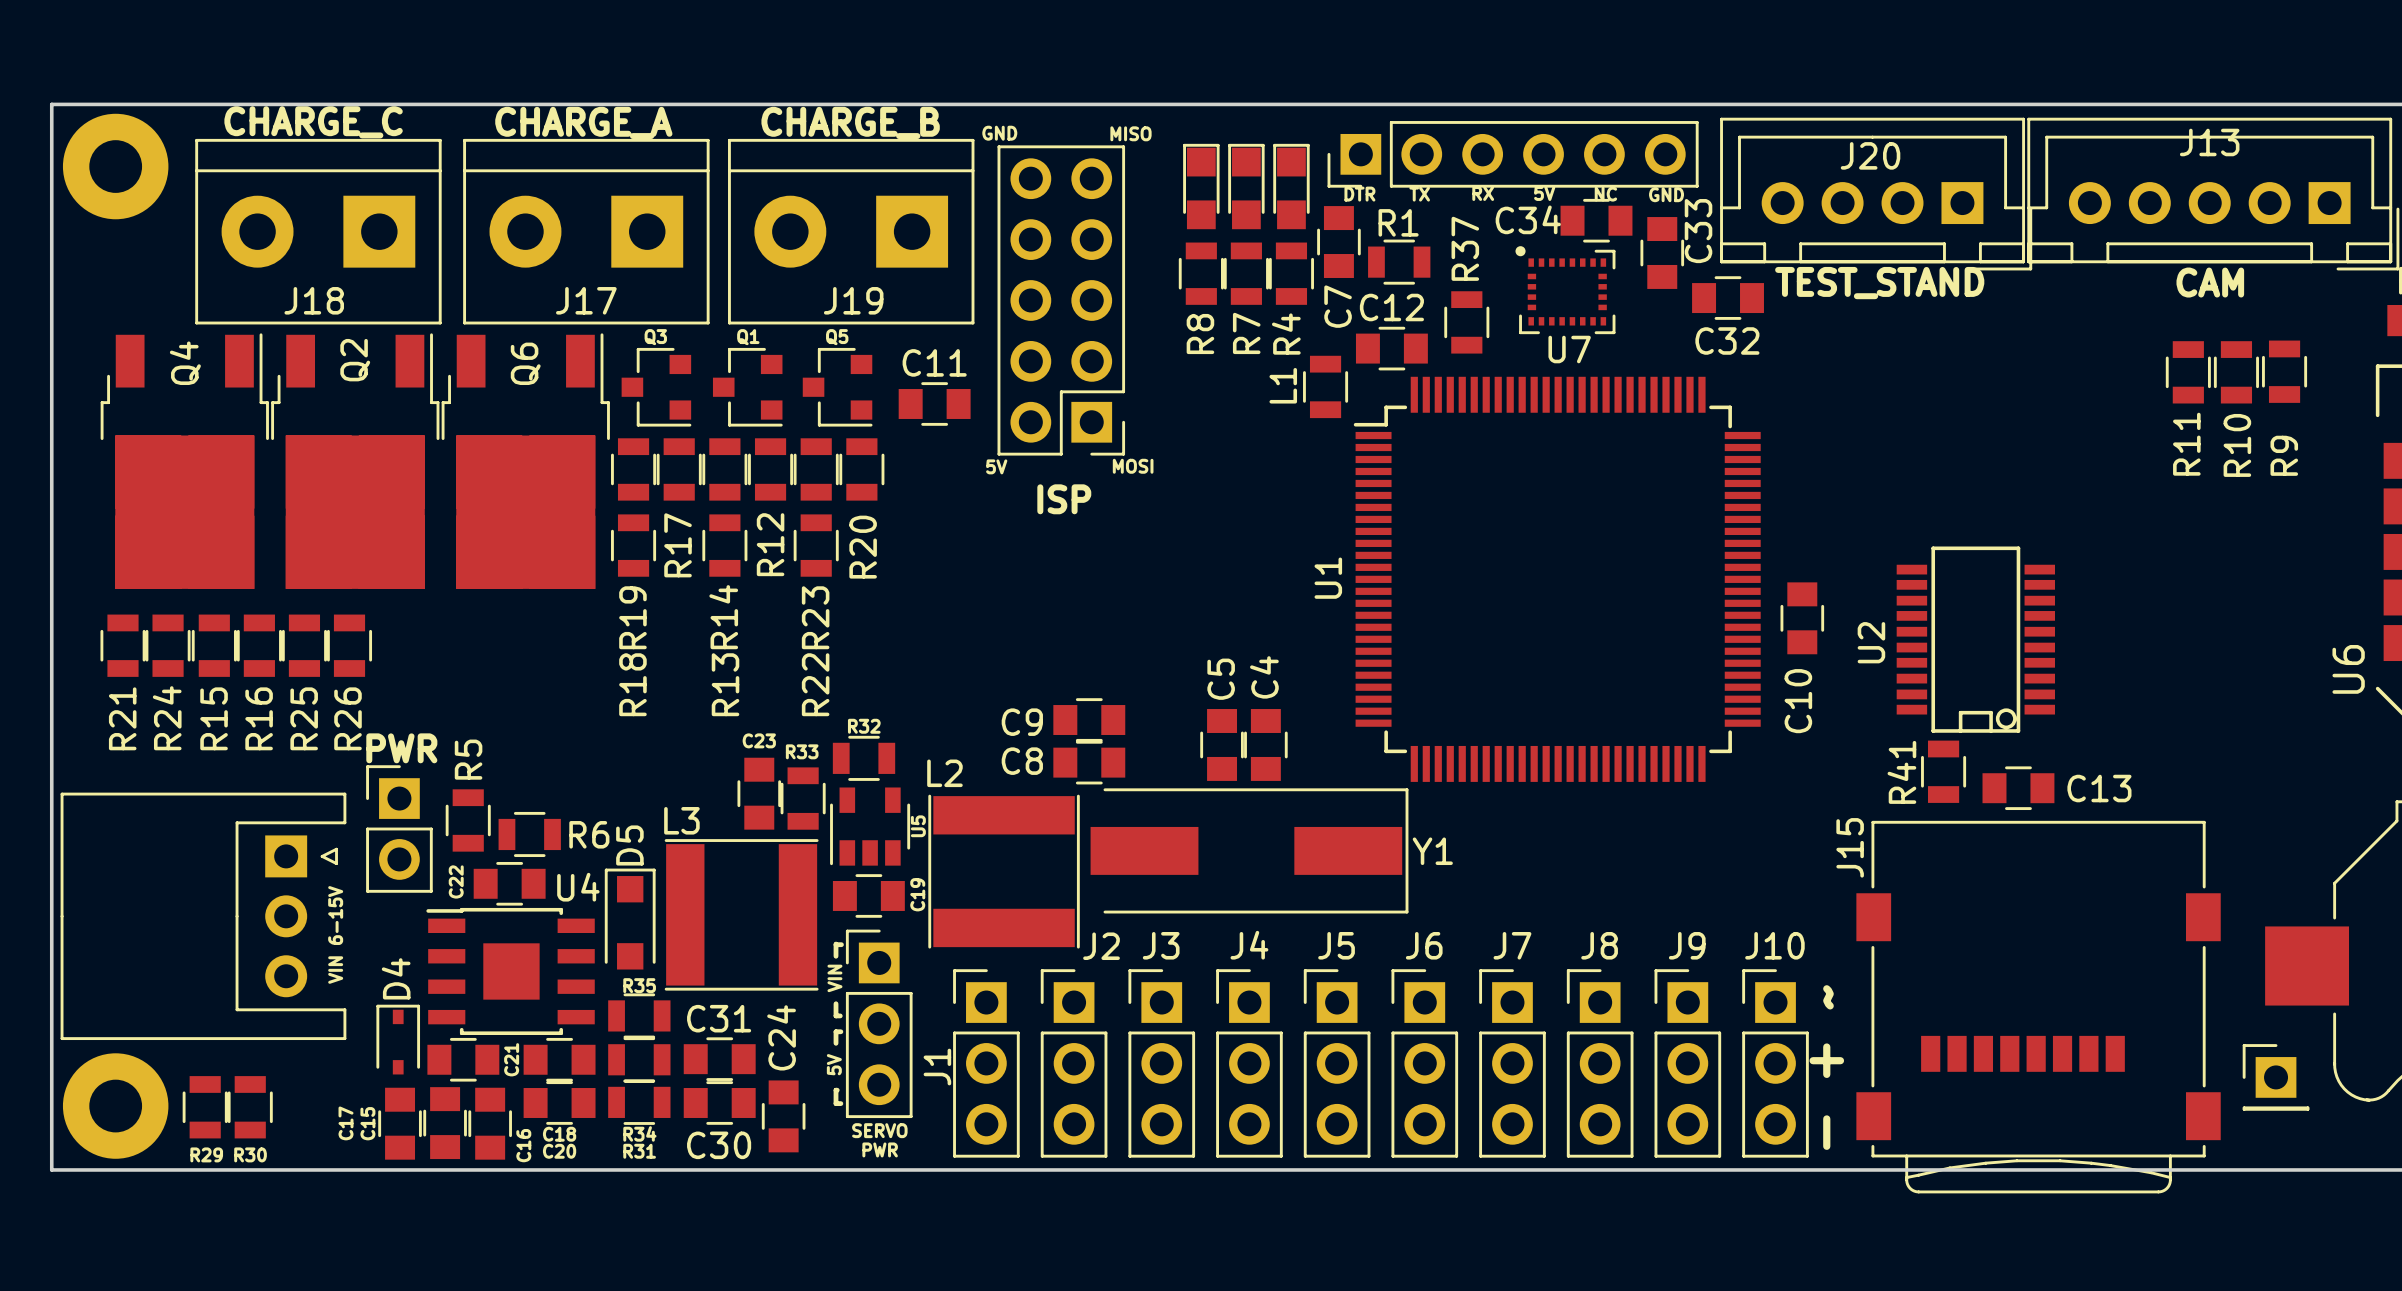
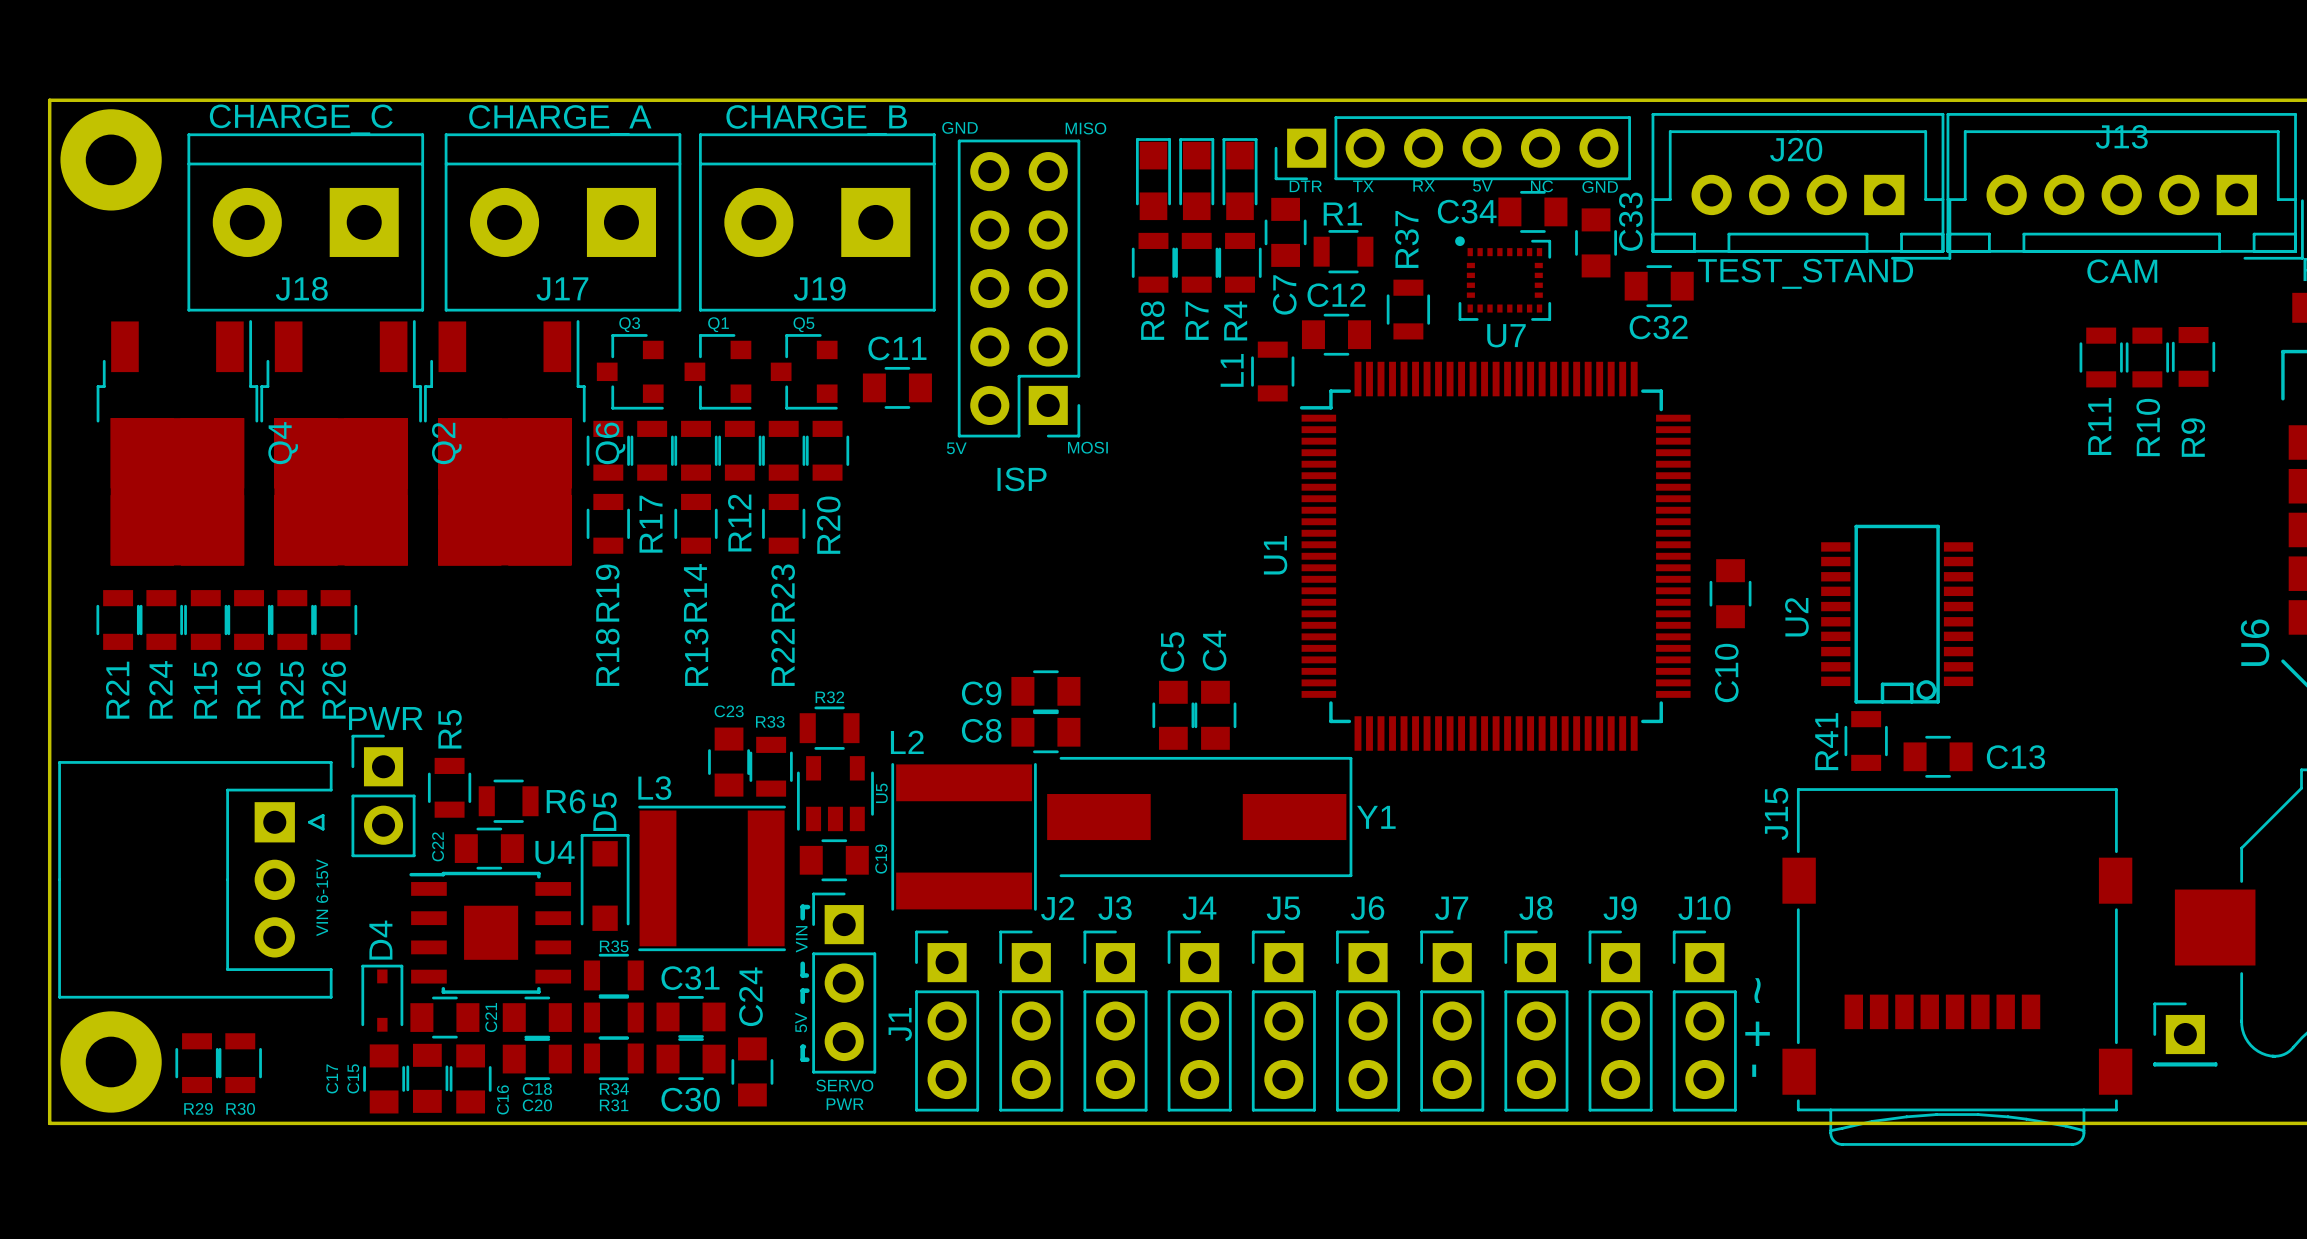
Q2 name position: Q2 (355, 360) -> Q2 (446, 443)
Q4 name position: Q4 (185, 363) -> Q4 (283, 443)
Q6 name position: Q6 (525, 363) -> Q6 (610, 443)

